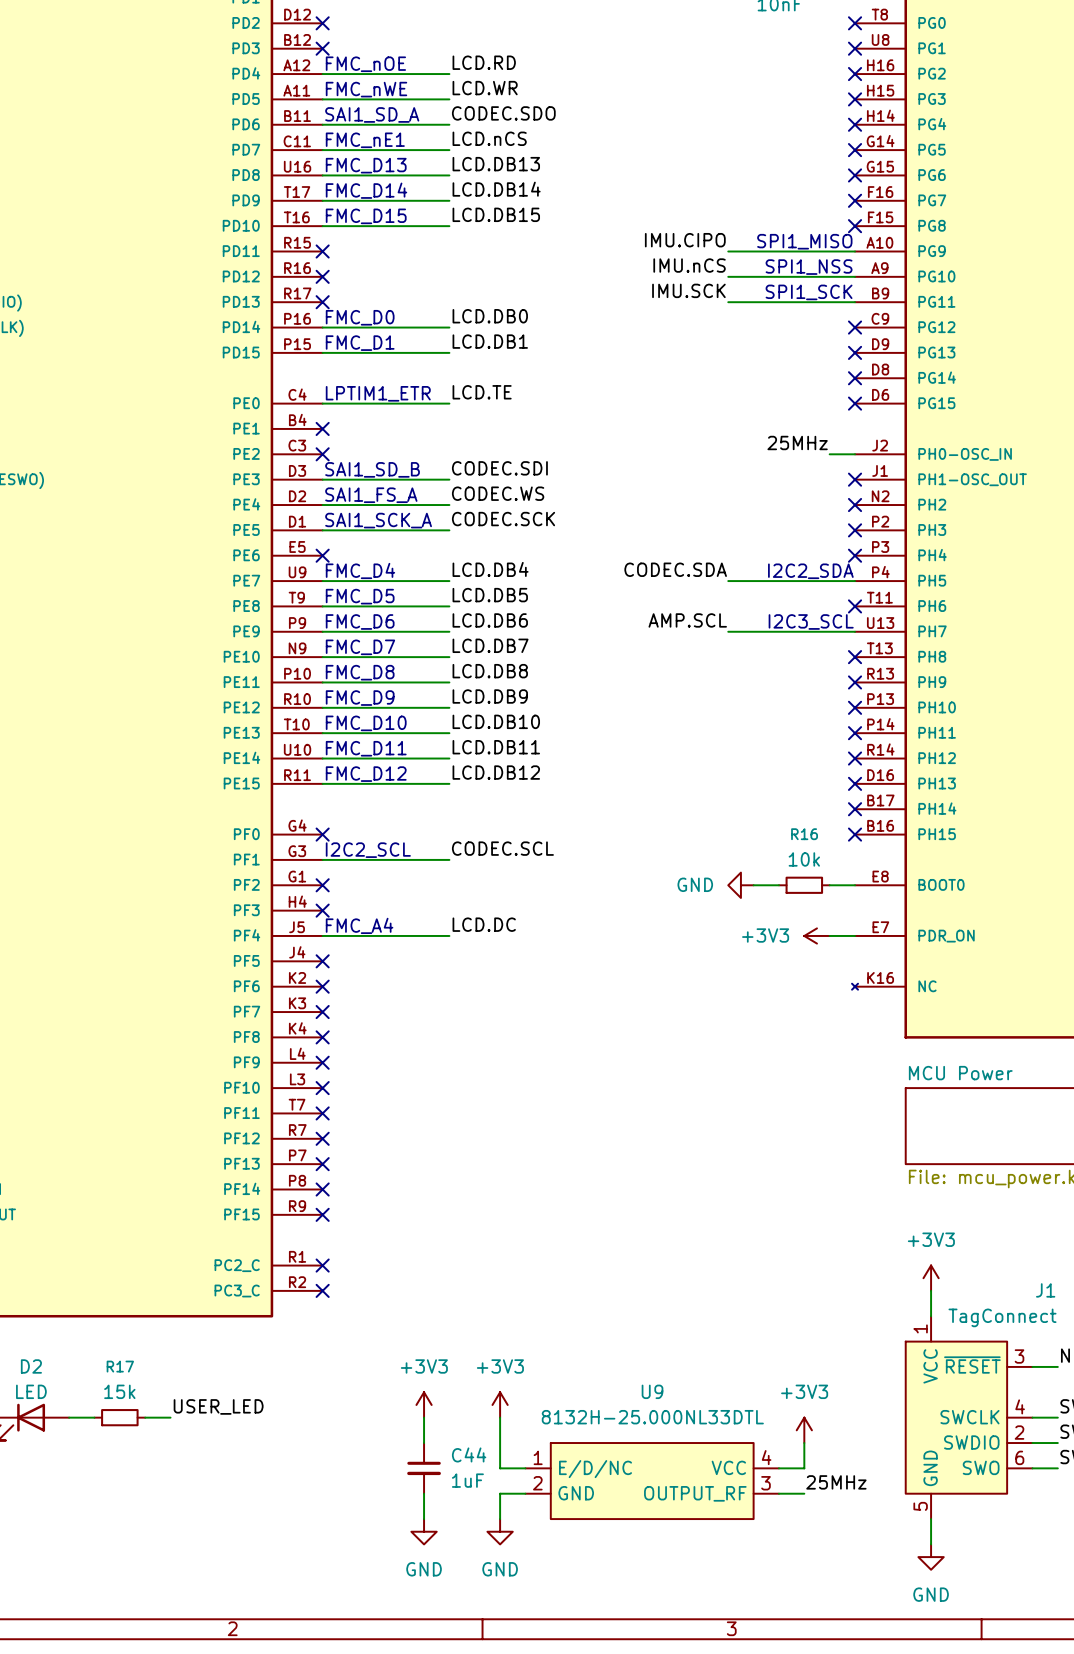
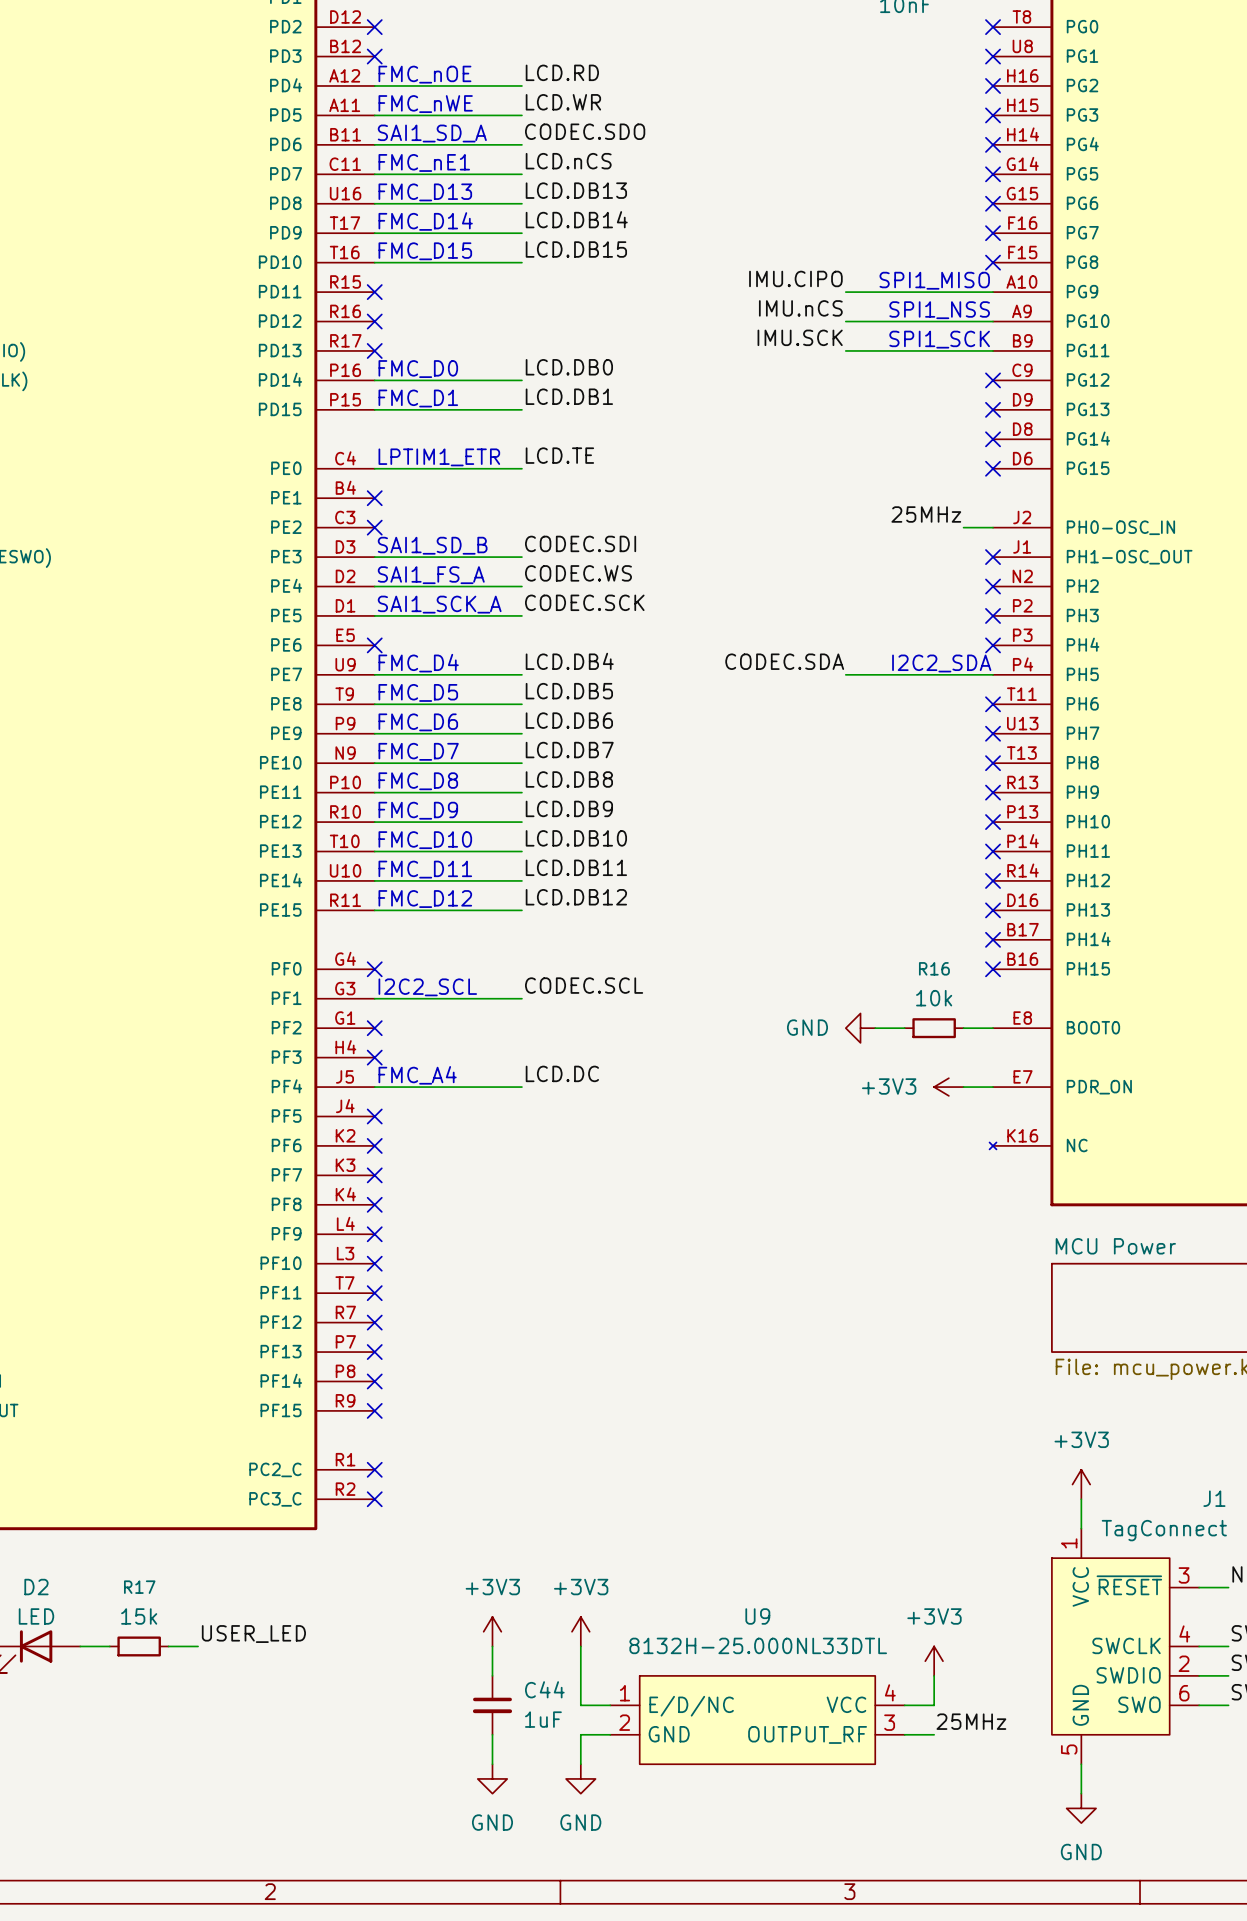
label: AMP.SCL (687, 620) -> none
text: I2C3_SCL (811, 621) -> none
wire: (728, 631) (855, 631) -> none
no-connect mark: none -> (993, 733)

